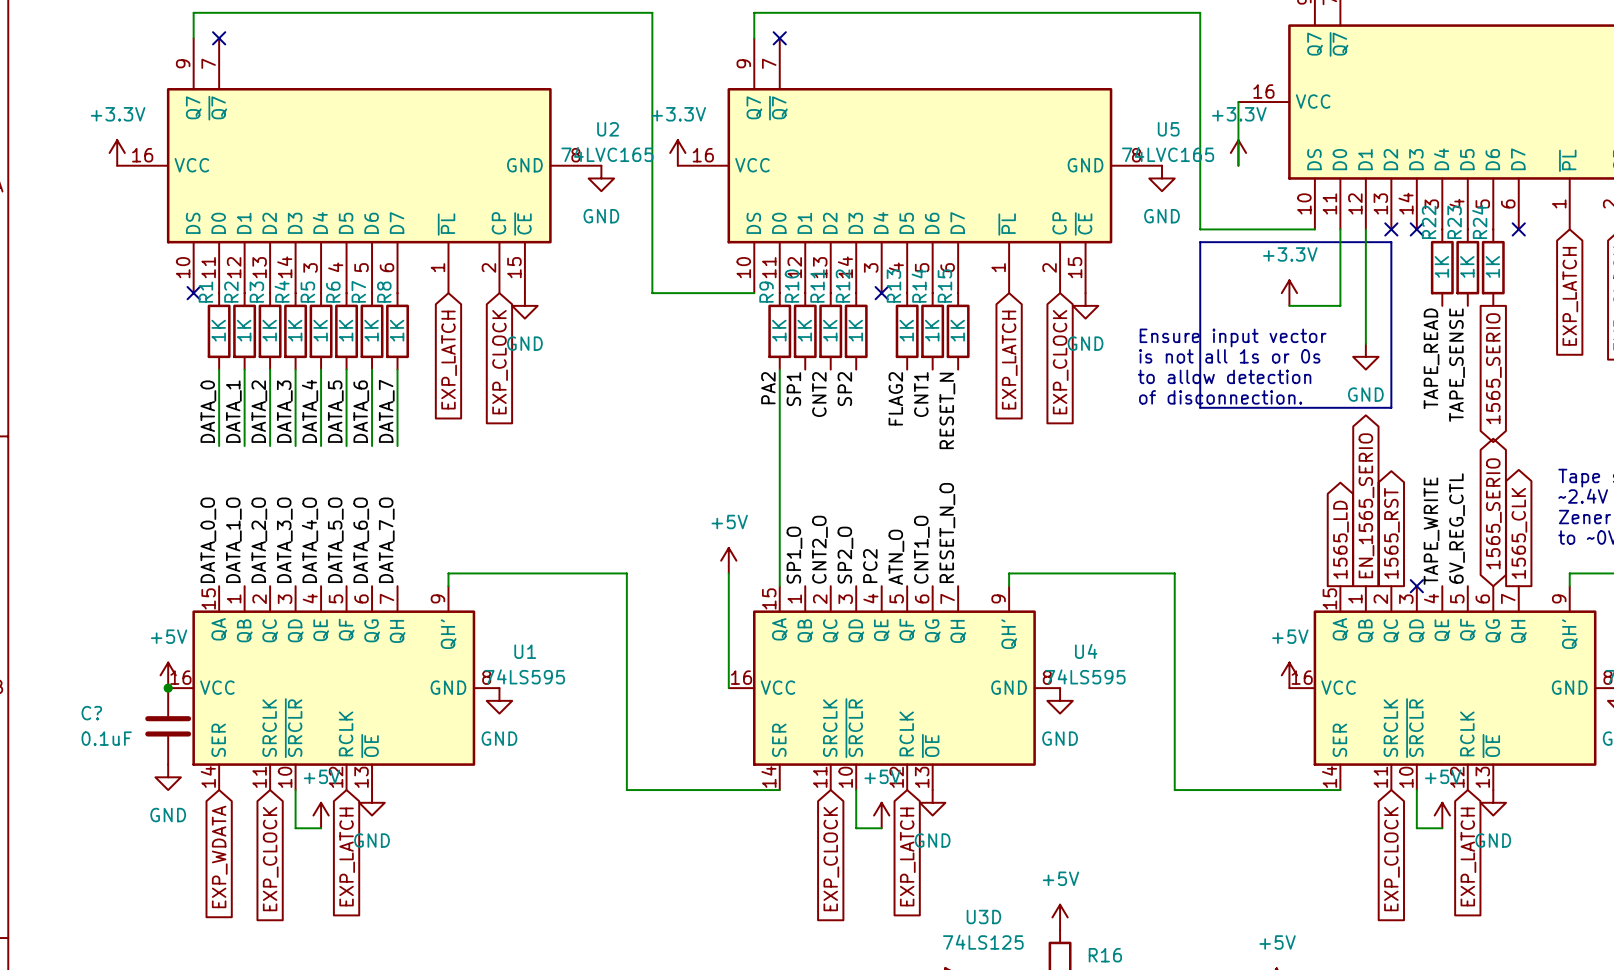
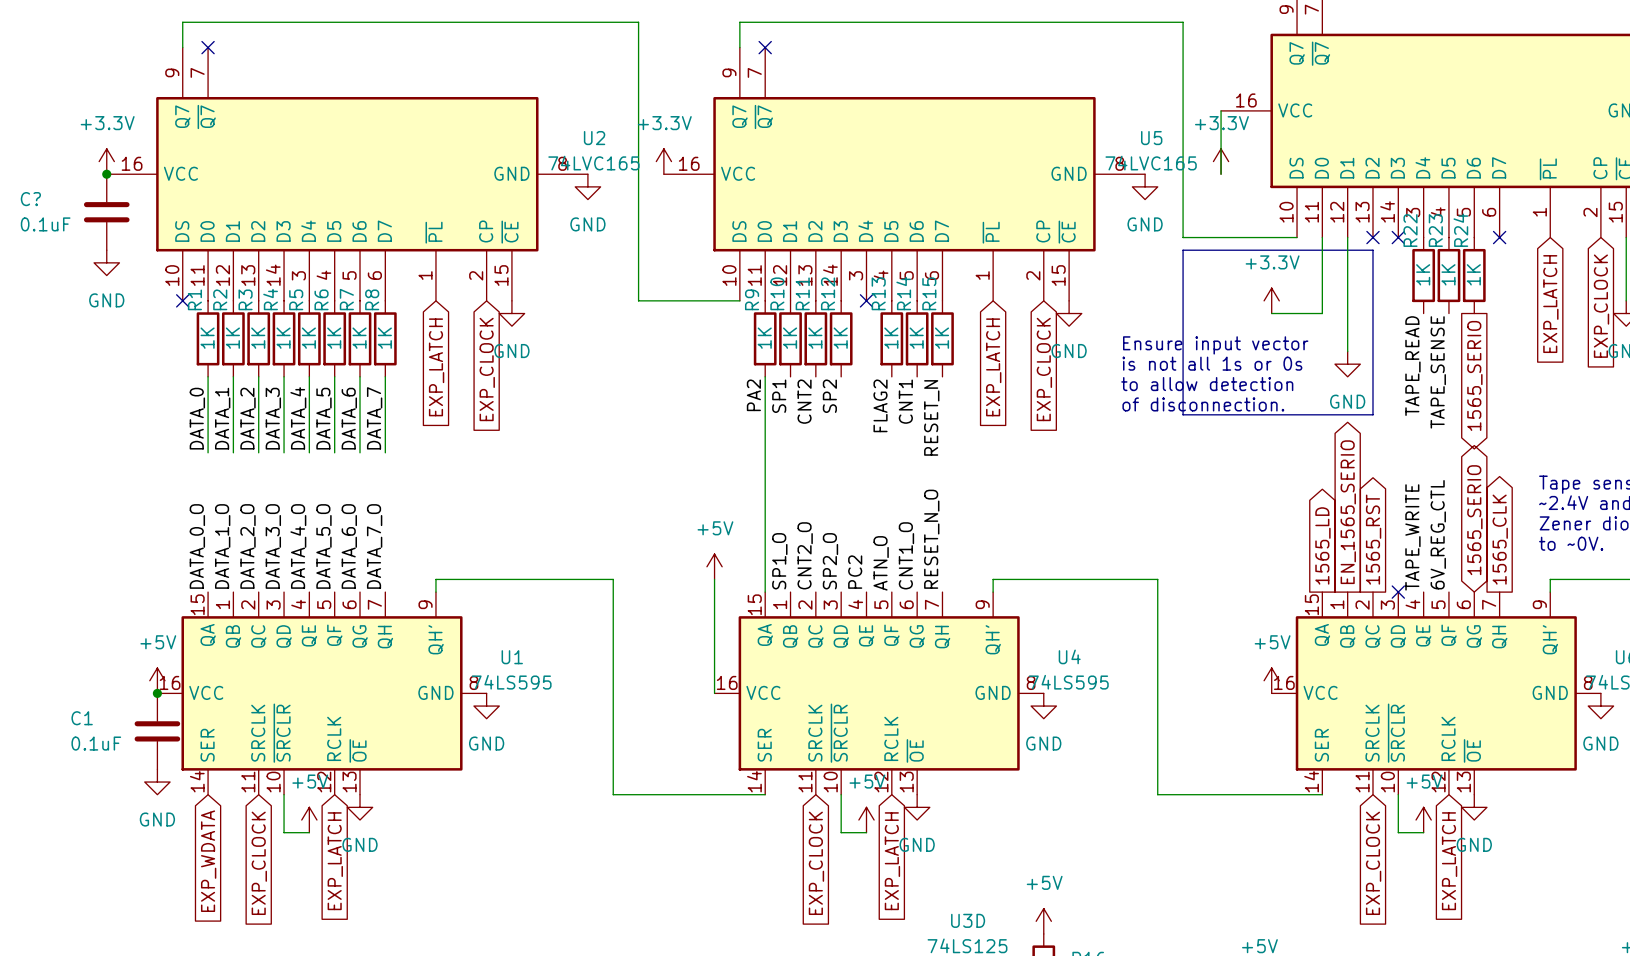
junction: none -> (106, 174)
C?: none -> 0.1uF (106, 212)
power symbol: none -> GND (106, 262)
C? name: C? (91, 713) -> C1 (82, 718)

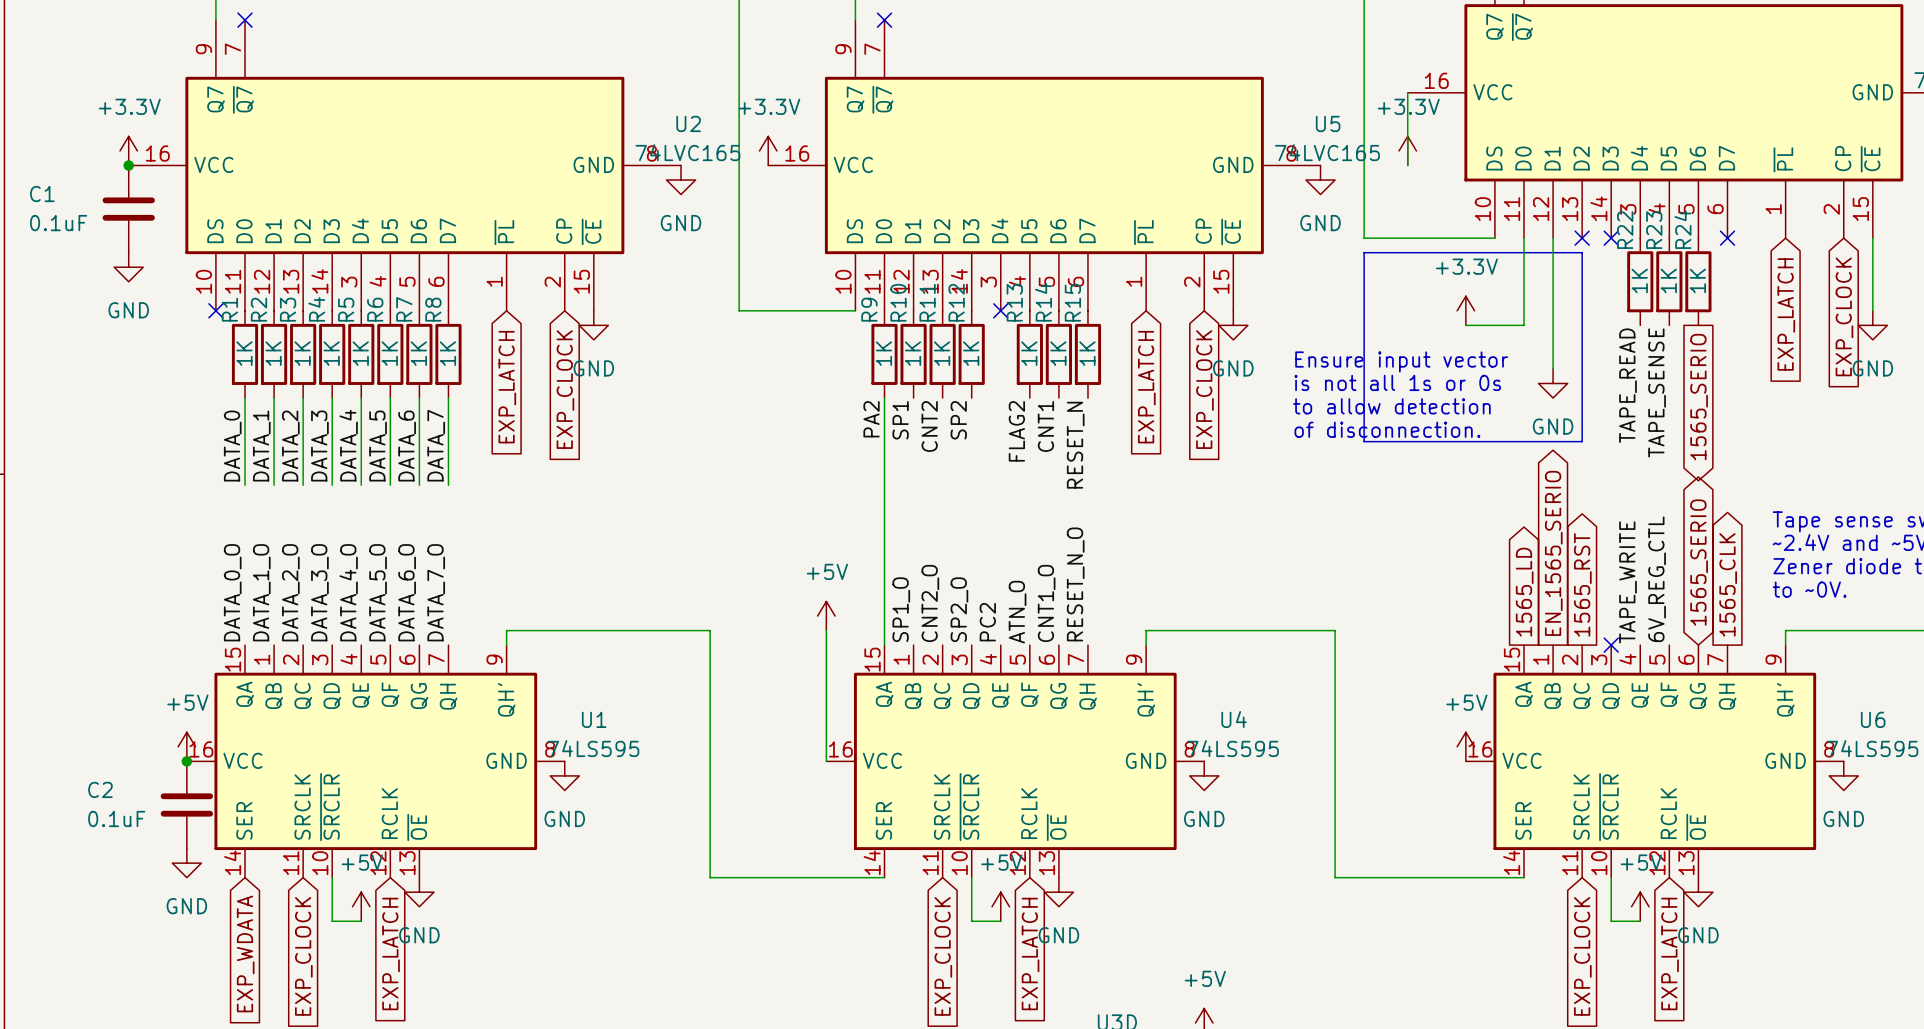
C? name: C? (30, 199) -> C1 (42, 194)
C1 name: C1 (82, 718) -> C2 (100, 789)

